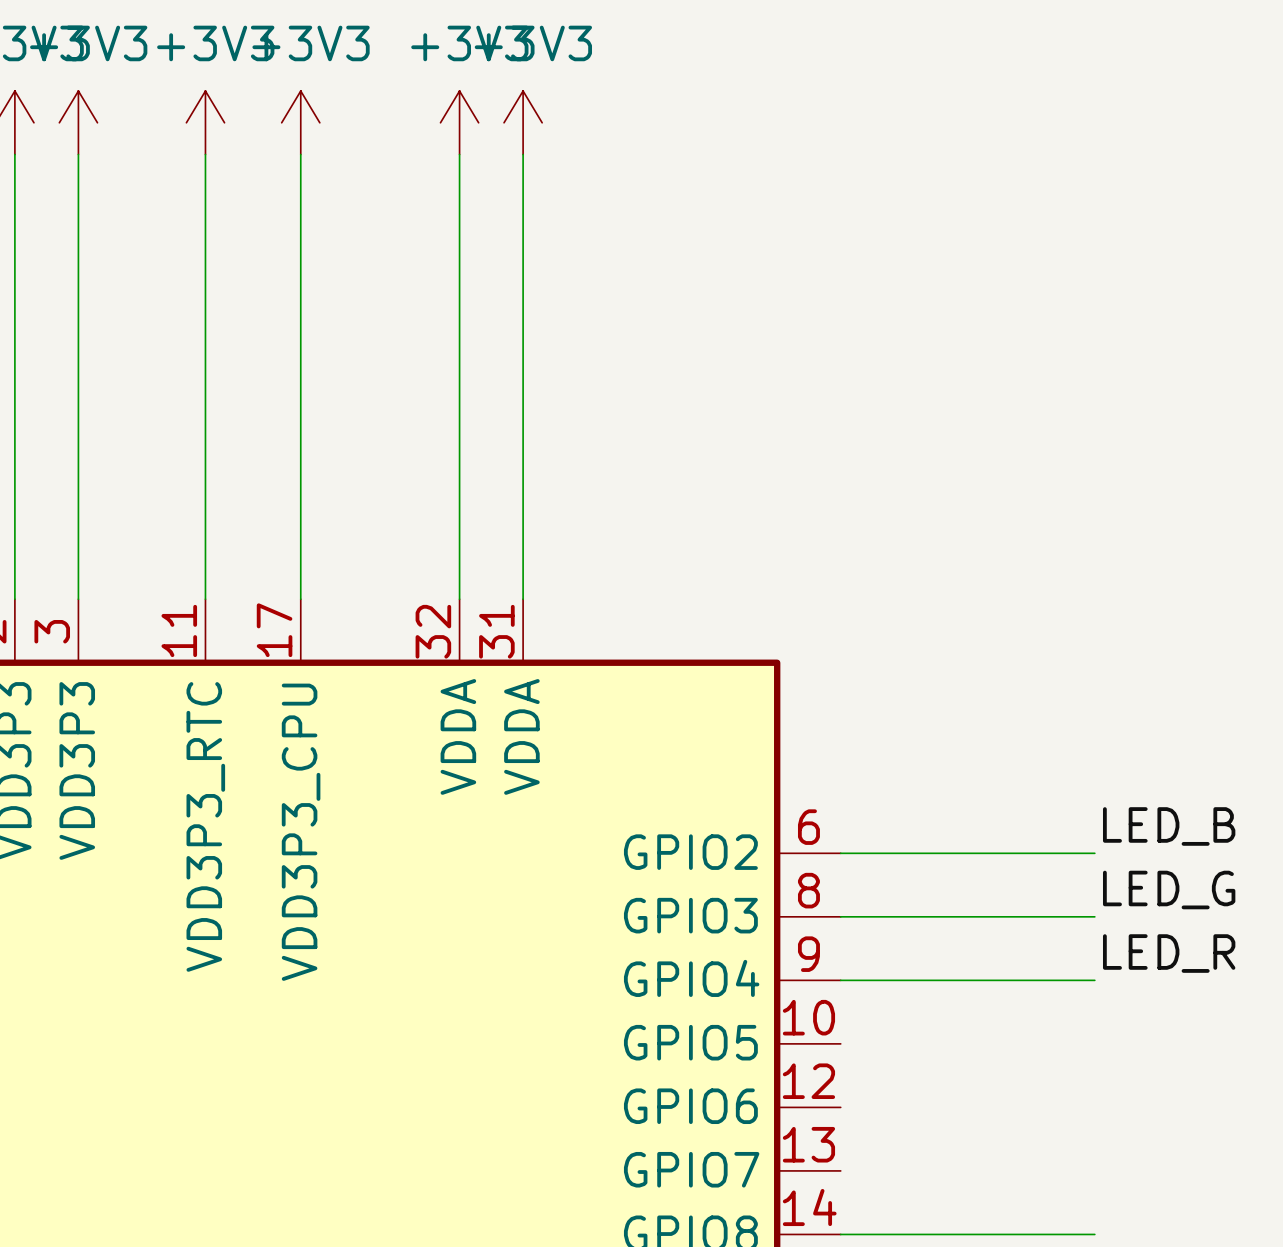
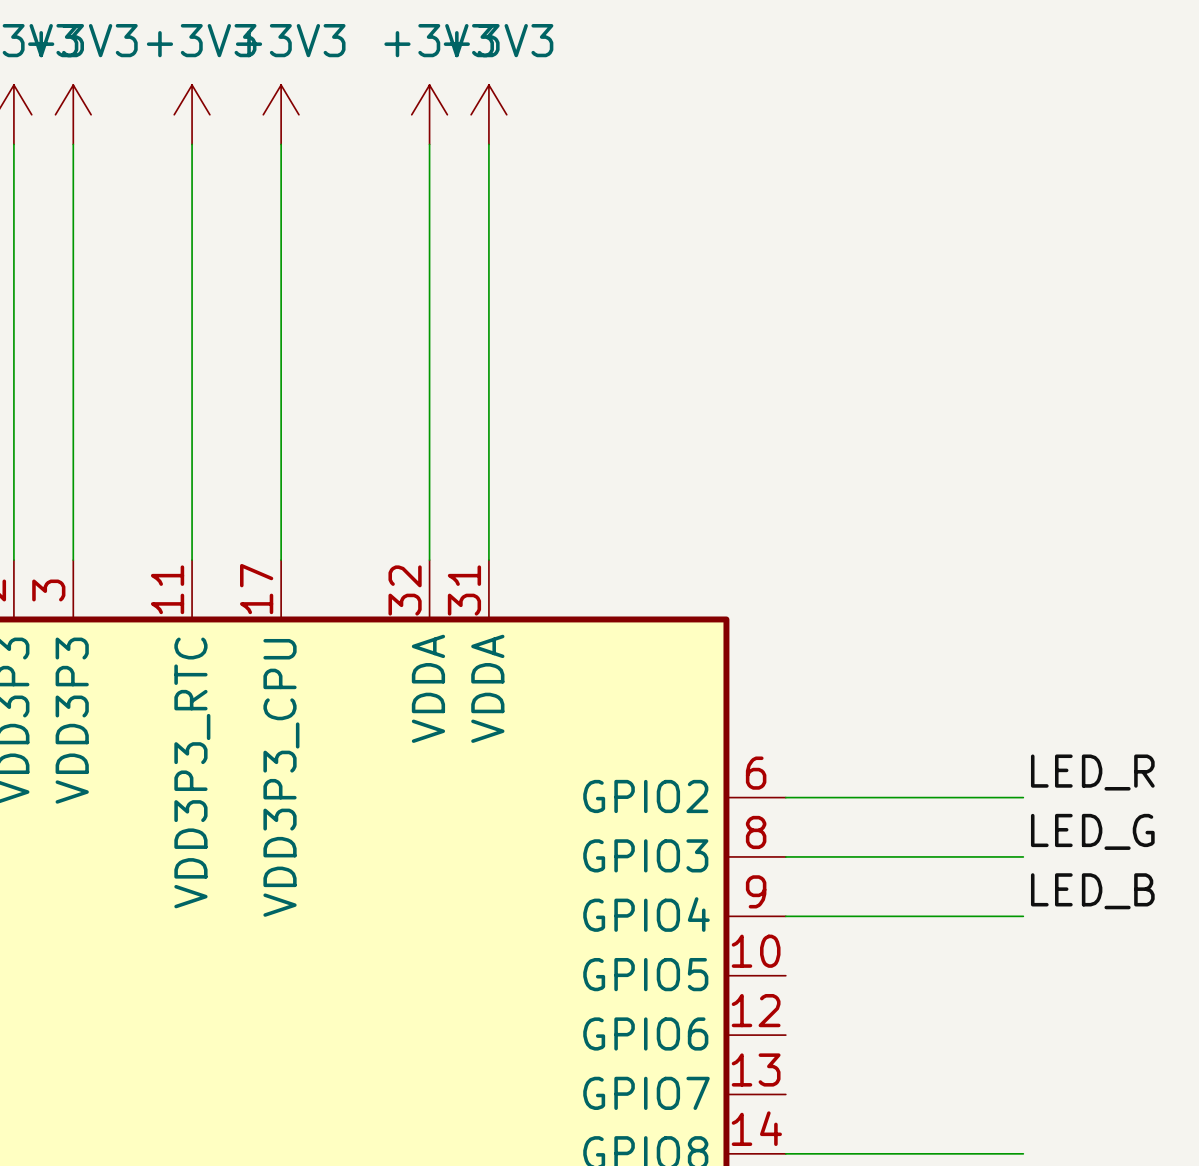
label: LED_B (1169, 826) -> LED_R (1092, 772)
label: LED_R (1169, 953) -> LED_B (1092, 891)

